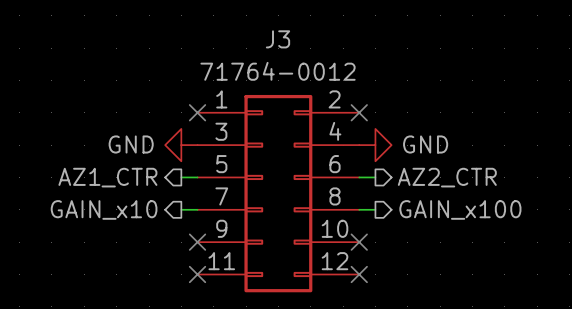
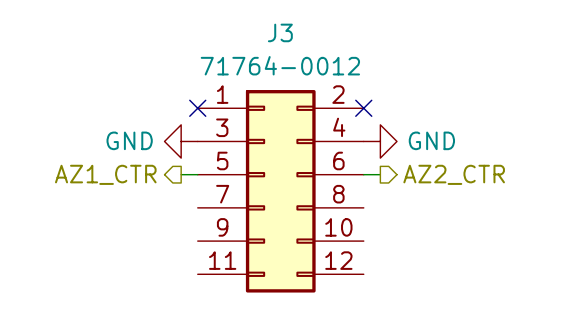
hierarchical label: GAIN_x10 (104, 209) -> none
wire: (181, 209) (197, 209) -> none
wire: (359, 209) (375, 209) -> none
hierarchical label: GAIN_x100 (460, 209) -> none
no-connect mark: (197, 242) -> none
no-connect mark: (359, 242) -> none
no-connect mark: (197, 274) -> none
no-connect mark: (359, 274) -> none

